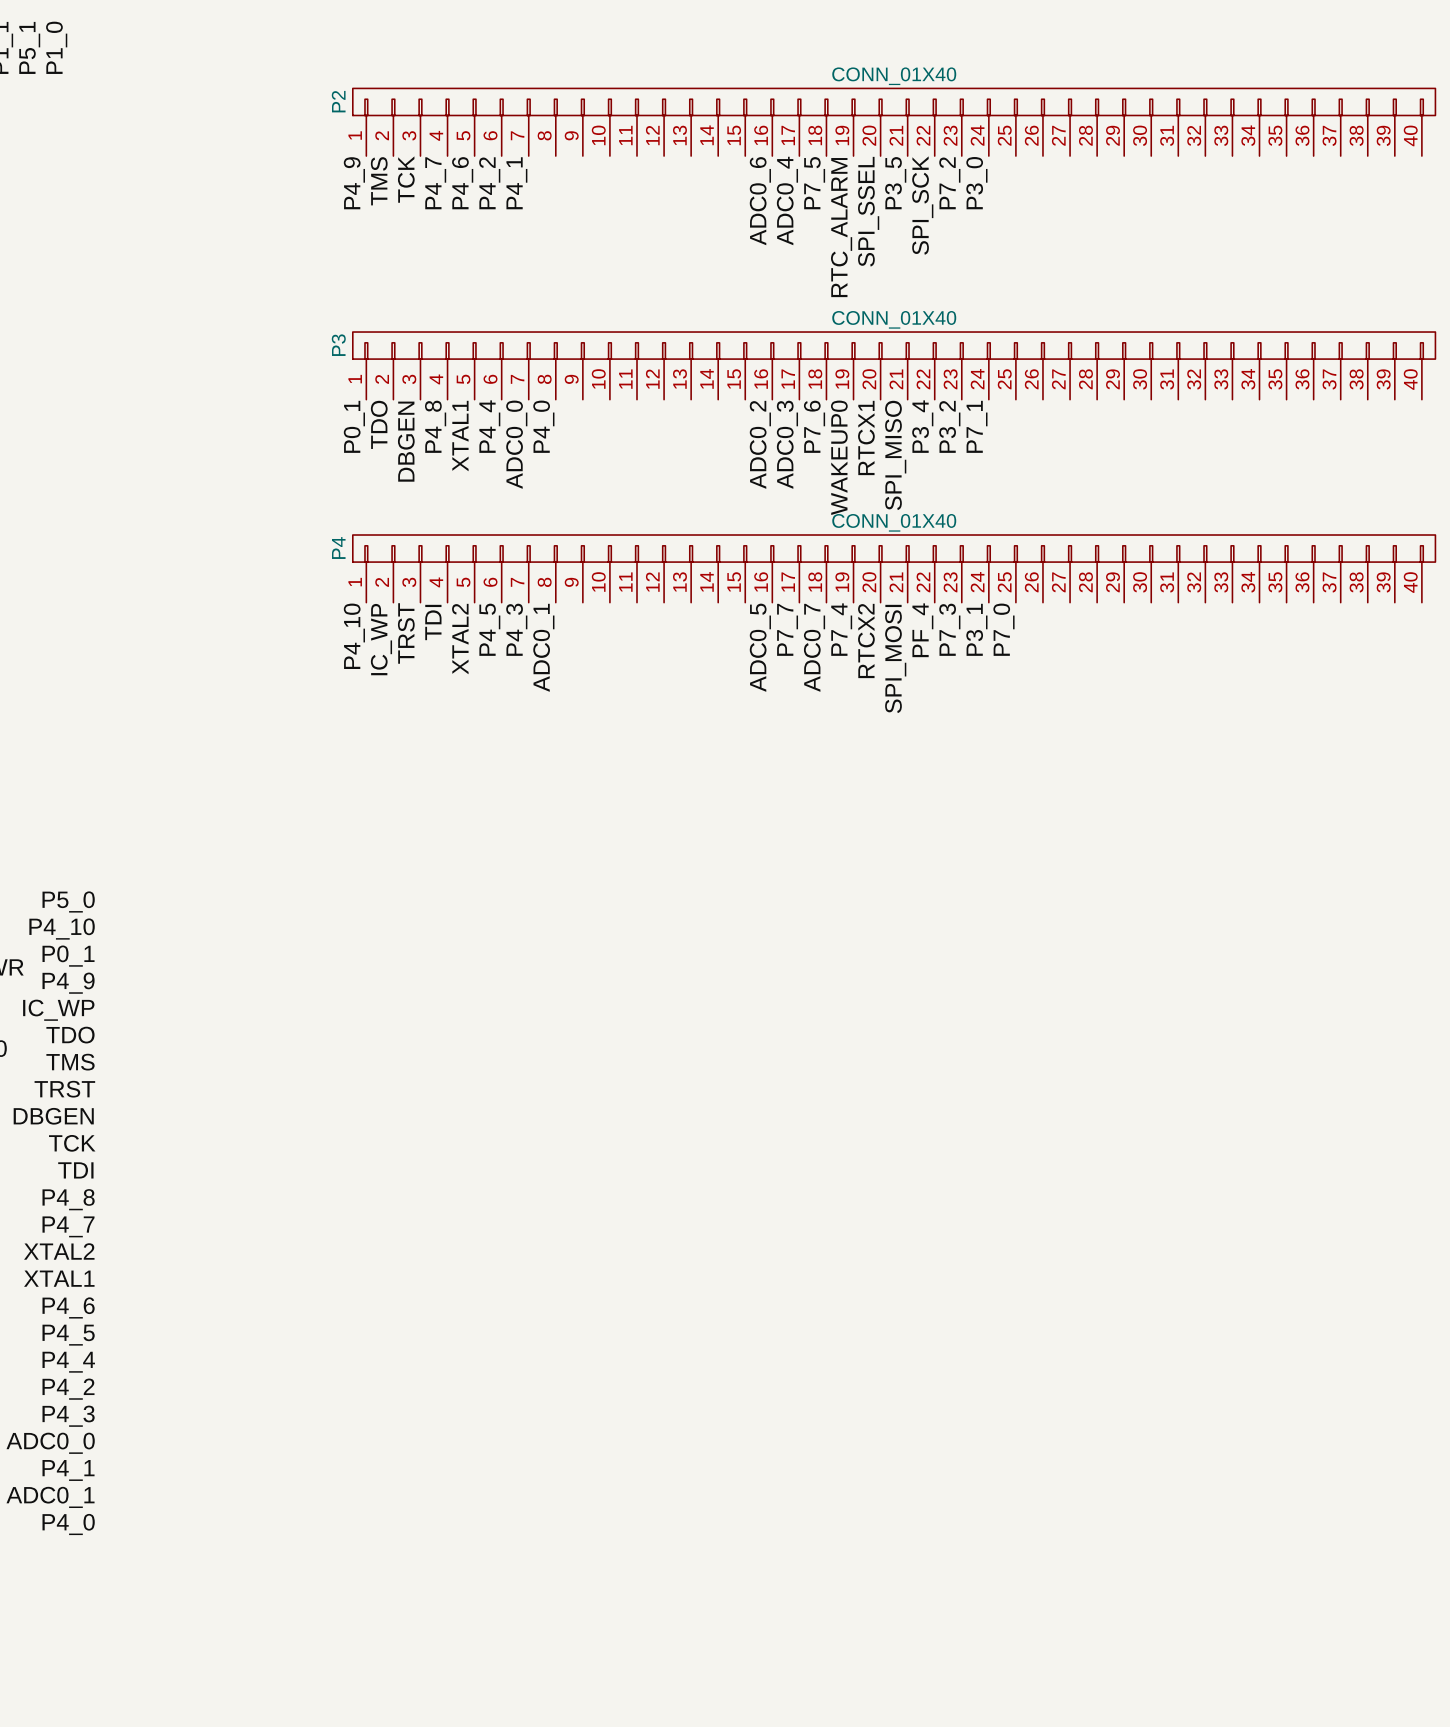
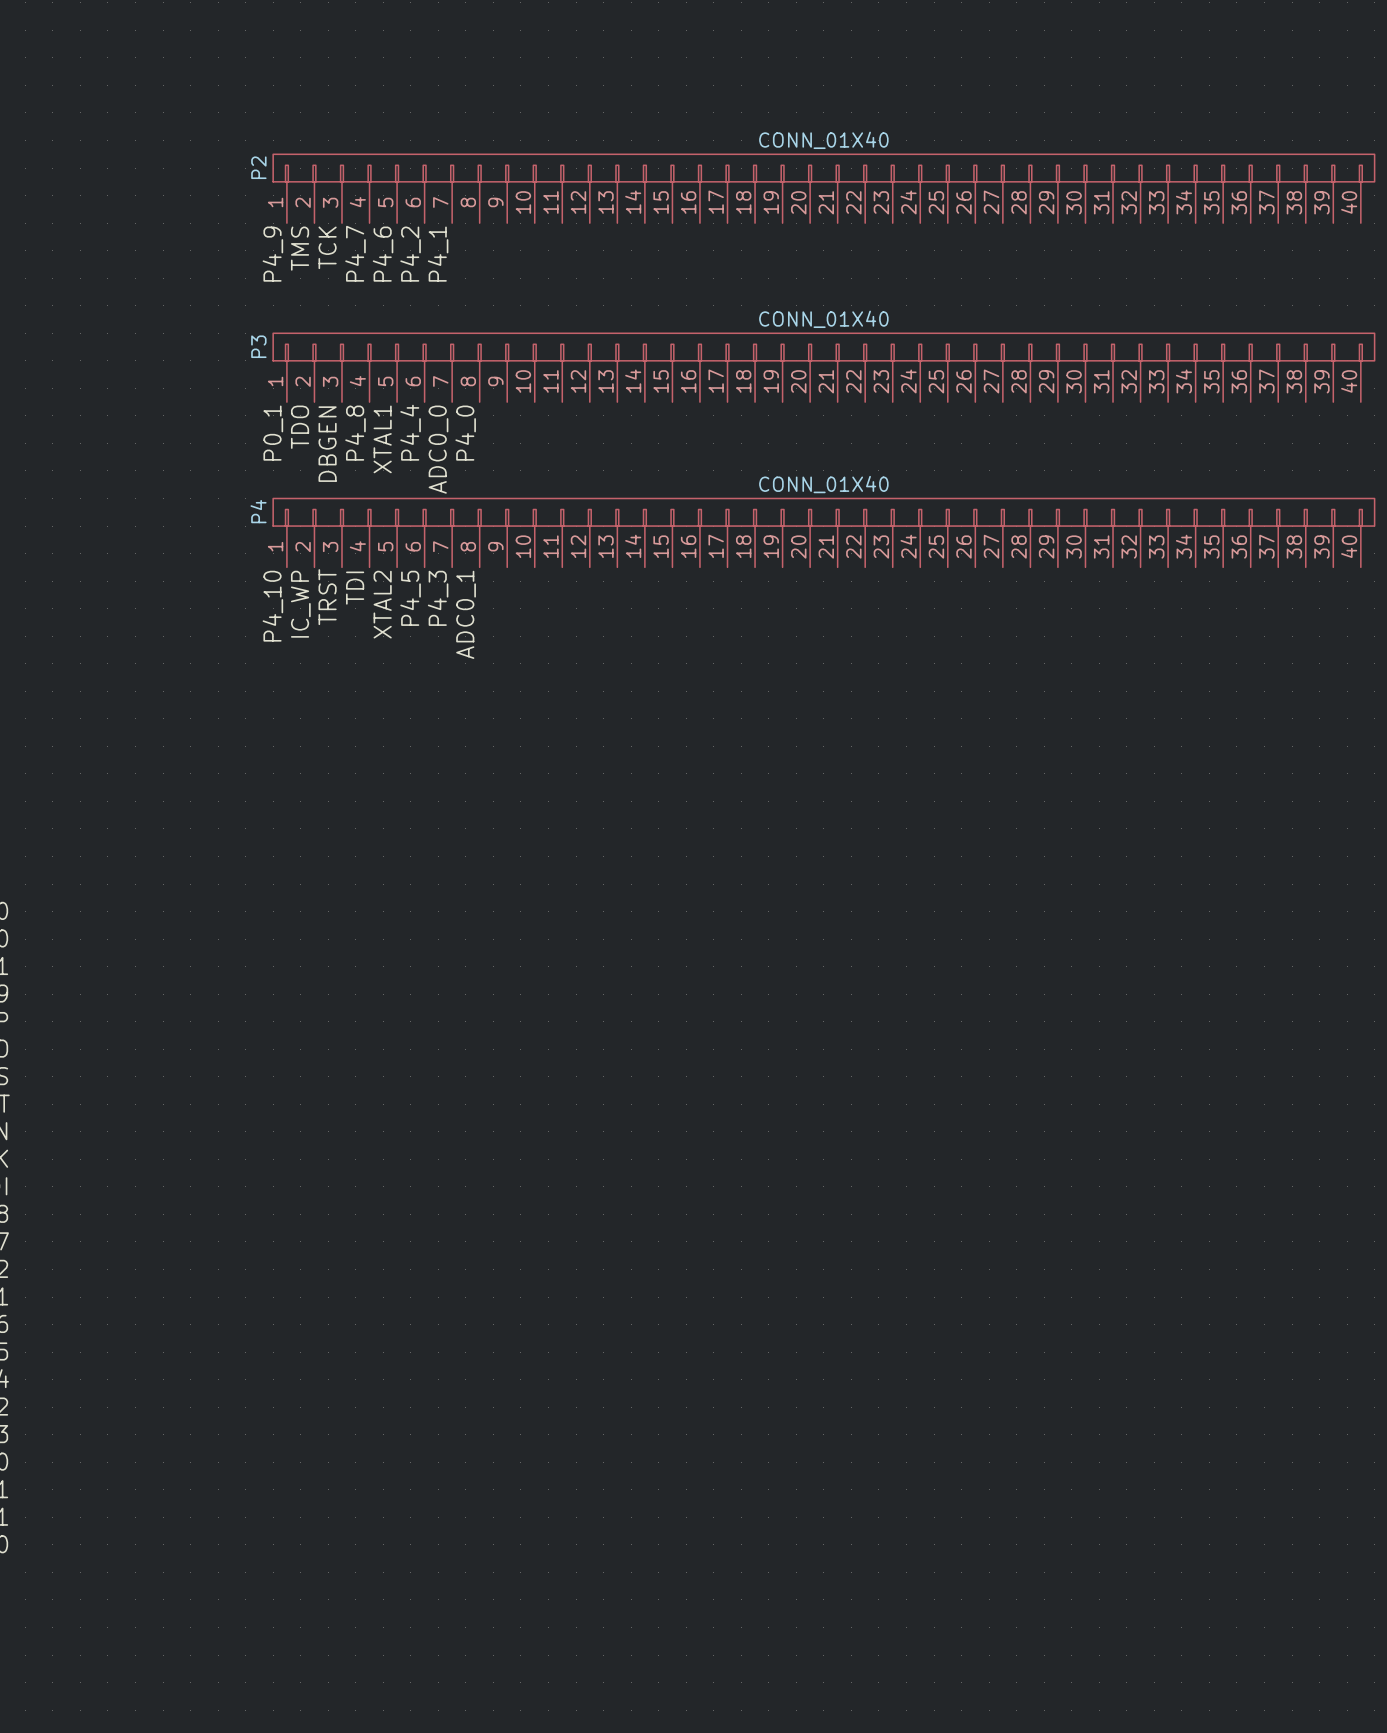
P2 position: (894, 122) -> (823, 188)
label position: TCK (406, 179) -> TCK (327, 247)
label position: TMS (379, 181) -> TMS (300, 248)
label position: P4_9 (354, 183) -> P4_9 (272, 254)
label position: P4_7 (435, 183) -> P4_7 (355, 253)
label position: P4_6 (462, 183) -> P4_6 (383, 254)
label position: P4_2 (489, 183) -> P4_2 (410, 254)
label position: P4_1 (516, 183) -> P4_1 (438, 254)
label: P7_5 (814, 183) -> none
label: P3_5 (895, 183) -> none
label: P7_2 (949, 183) -> none
label: P3_0 (976, 183) -> none
label: ADC0_6 (760, 201) -> none
label: ADC0_4 (787, 201) -> none
label: SPI_SCK (922, 205) -> none
label: SPI_SSEL (868, 211) -> none
label: RTC_ALARM (841, 227) -> none
label: P7_6 (814, 426) -> none
label: P3_4 (922, 426) -> none
label: P3_2 (949, 426) -> none
label: P7_1 (977, 426) -> none
label: RTCX1 (866, 437) -> none
label: ADC0_2 (760, 444) -> none
label: ADC0_3 (787, 444) -> none
label: SPI_MISO (895, 455) -> none
label: WAKEUP0 (839, 457) -> none
P4 position: (894, 568) -> (823, 532)
label position: TDI (433, 622) -> TDI (355, 588)
label position: P4_5 (489, 629) -> P4_5 (410, 598)
label position: P4_3 (516, 629) -> P4_3 (438, 598)
label: P7_7 (787, 629) -> none
label: P7_4 (841, 629) -> none
label: P7_3 (949, 629) -> none
label: P3_1 (976, 629) -> none
label: P7_0 (1003, 629) -> none
label: PF_4 (922, 630) -> none
label position: TRST (406, 633) -> TRST (327, 597)
label position: P4_10 (354, 636) -> P4_10 (272, 606)
label position: IC_WP (381, 639) -> IC_WP (300, 604)
label position: XTAL2 (460, 639) -> XTAL2 (382, 604)
label: RTCX2 (866, 640) -> none
label position: ADC0_1 (543, 647) -> ADC0_1 (466, 614)
label: ADC0_5 (760, 647) -> none
label: ADC0_7 (814, 647) -> none
label: SPI_MOSI (895, 658) -> none

